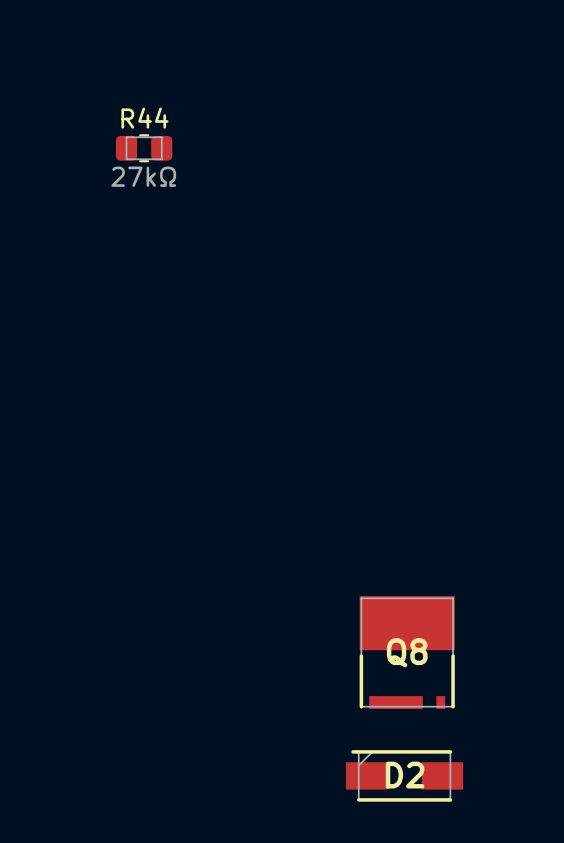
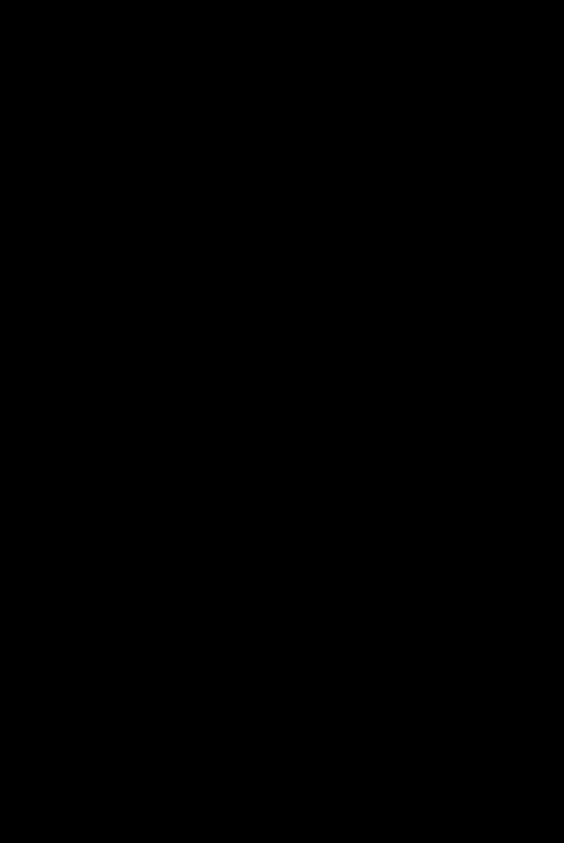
R44: 27kΩ (144, 148) -> none
Q8: (407, 652) -> none
D2: (404, 775) -> none

